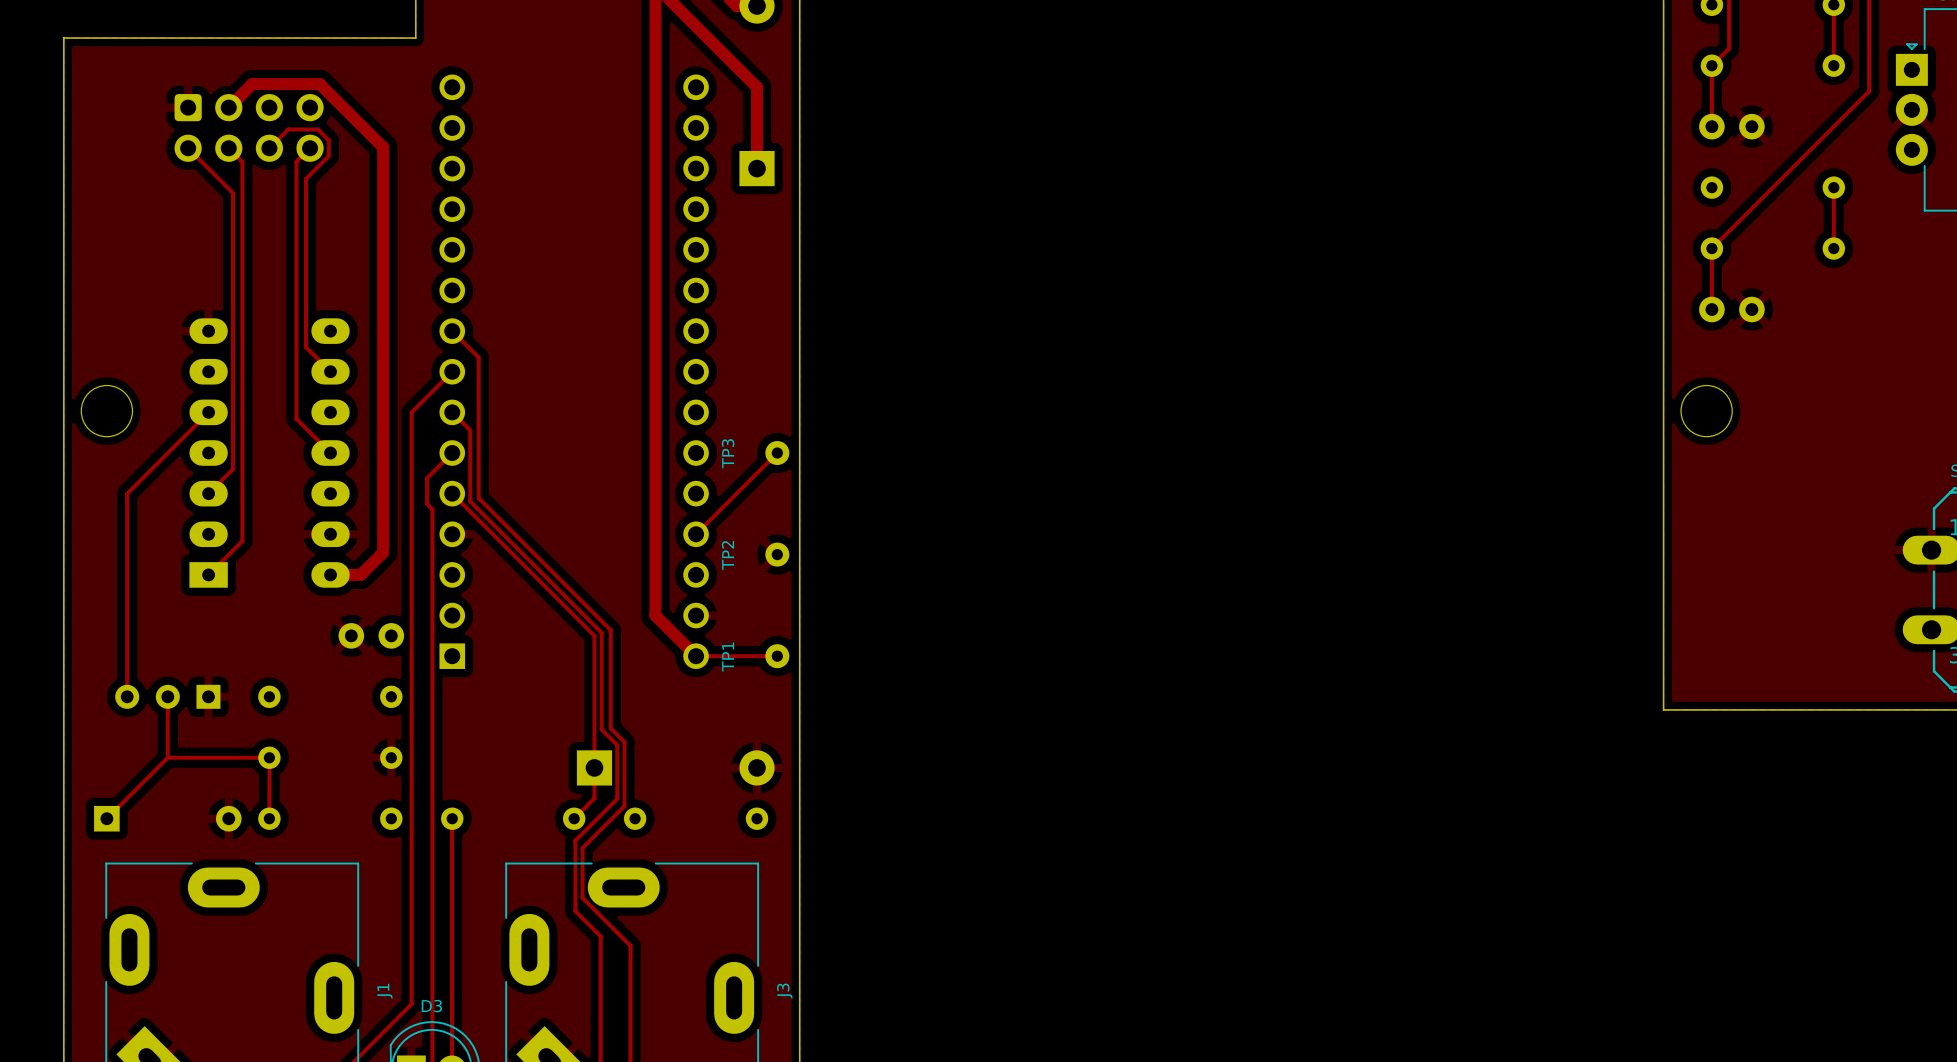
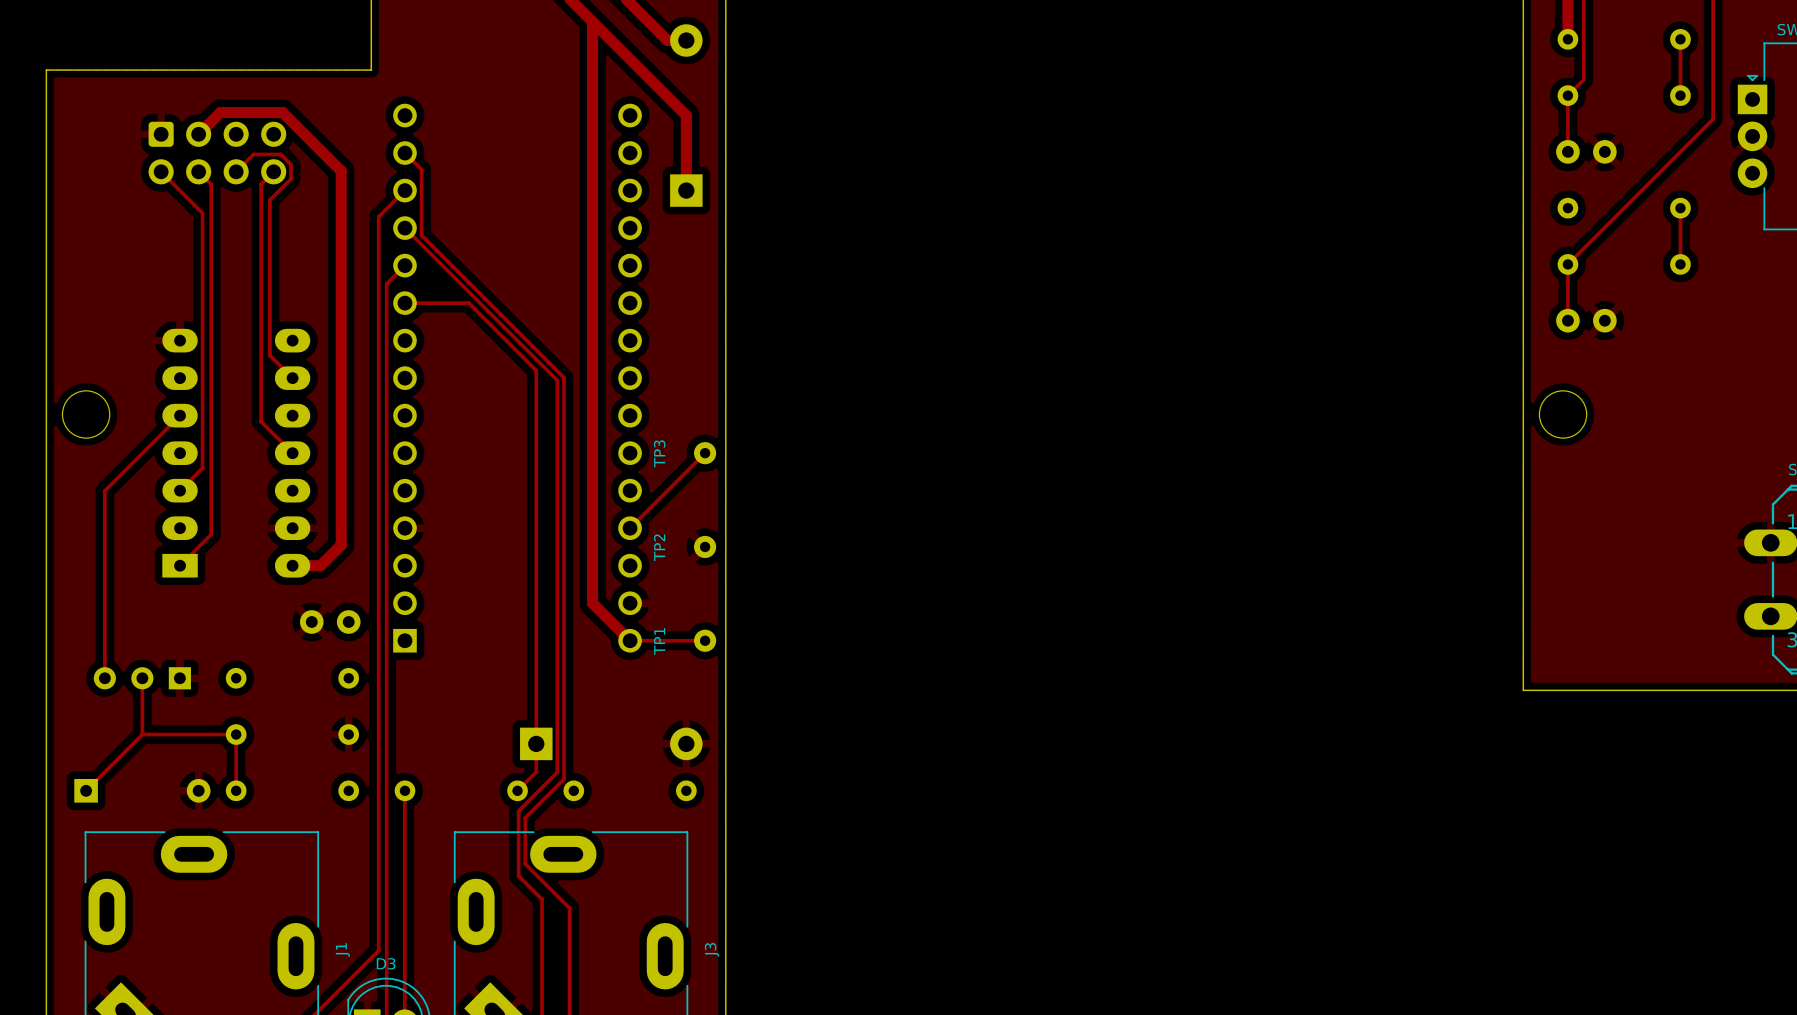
track: (452, 331) (478, 357) (478, 498) (610, 630) (610, 728) (624, 742) -> (404, 153) (421, 169) (421, 235) (563, 377) (563, 720)
track: (452, 371) (411, 412) (411, 1004) -> (404, 190) (378, 216) (378, 950) (367, 961)
track: (452, 412) (470, 430) (470, 501) (601, 632) (601, 729) (617, 745) -> (404, 228) (557, 380) (557, 722)
track: (452, 453) (427, 478) (427, 504) (432, 509) -> (404, 265) (386, 283) (386, 505)
track: (452, 493) (594, 635) -> (404, 303) (468, 303) (536, 370) (536, 621)

